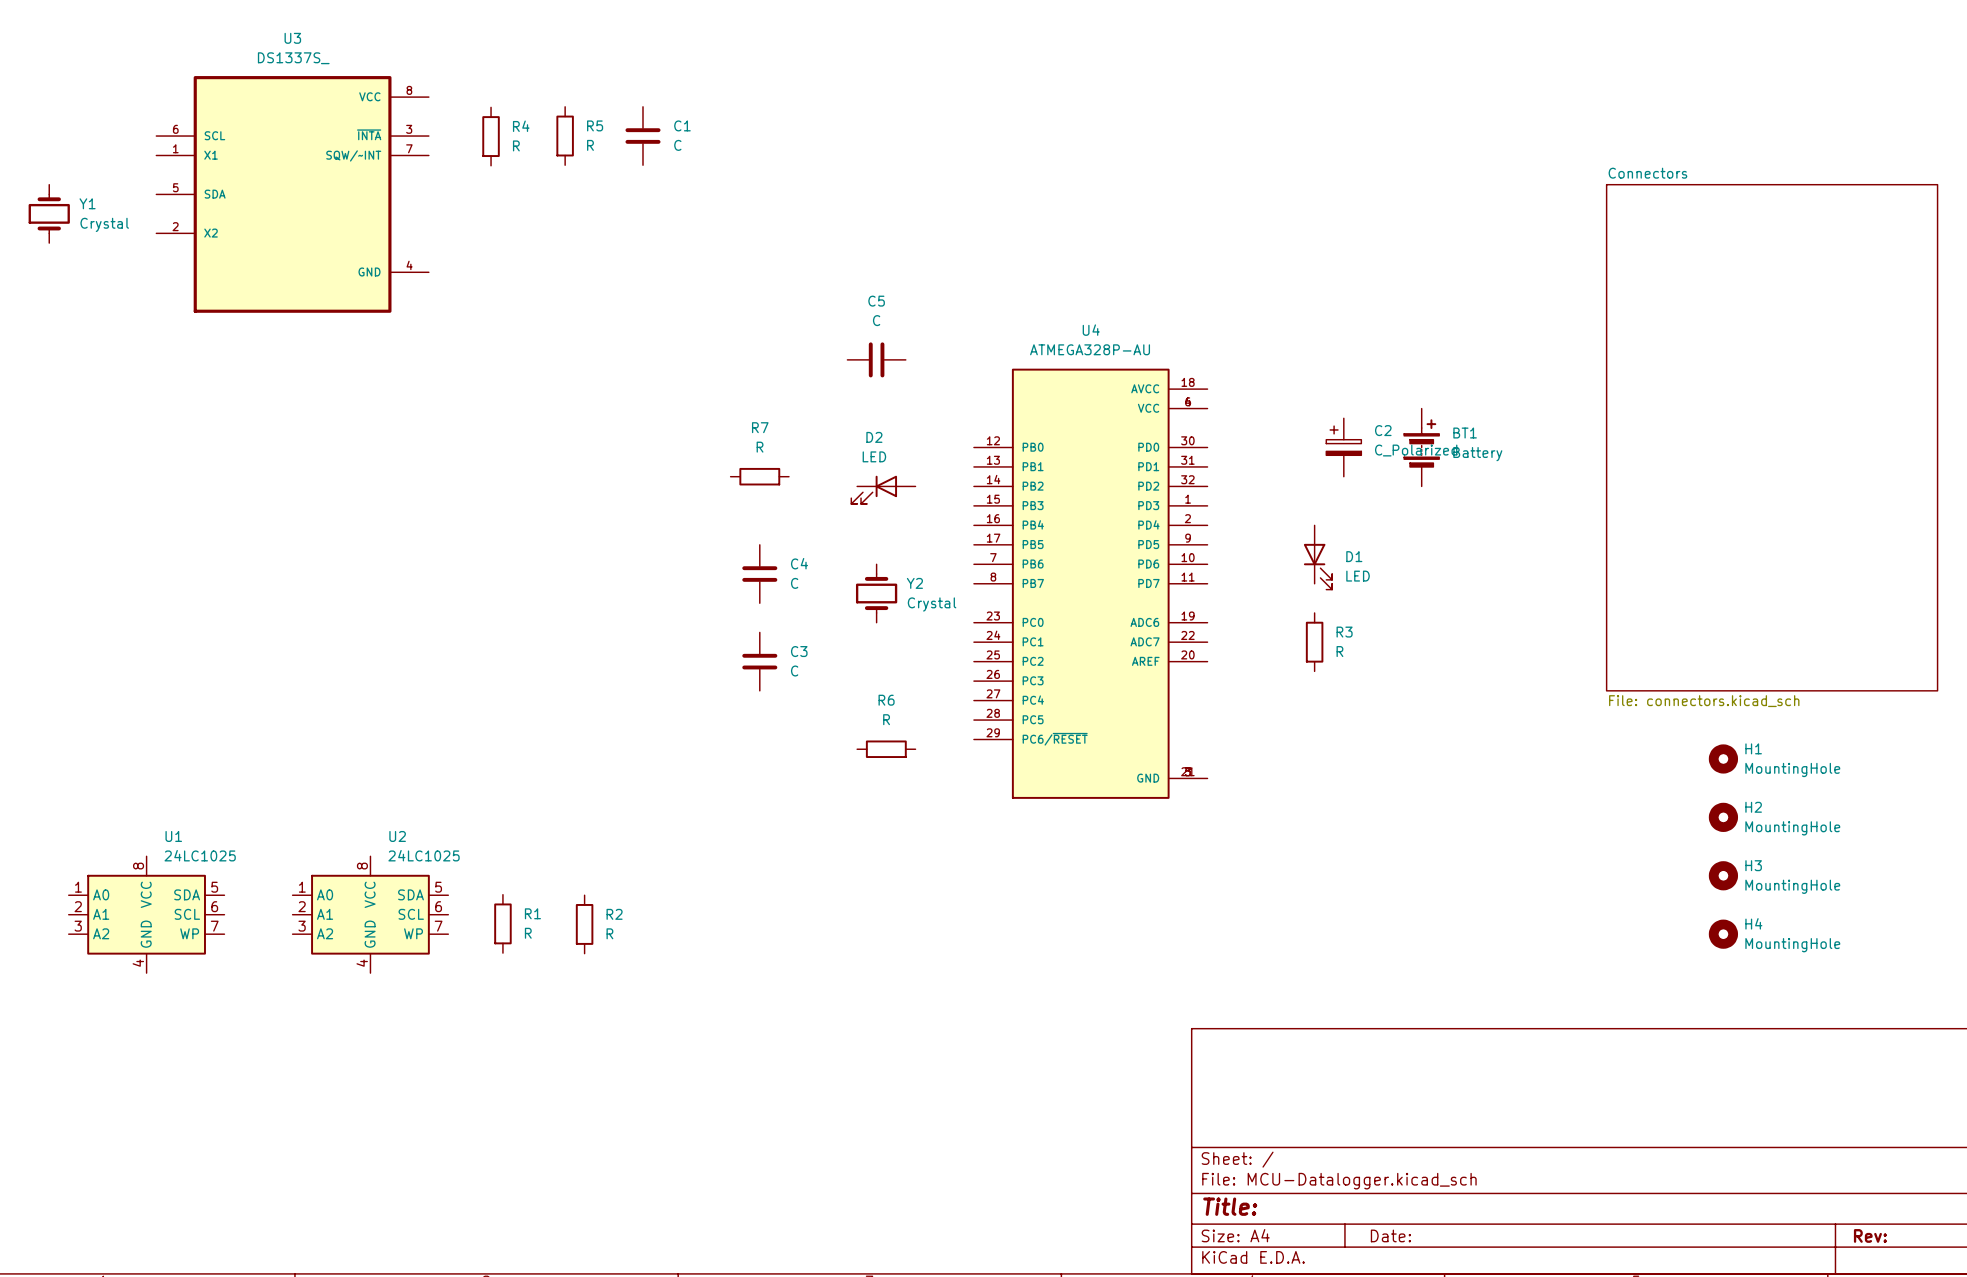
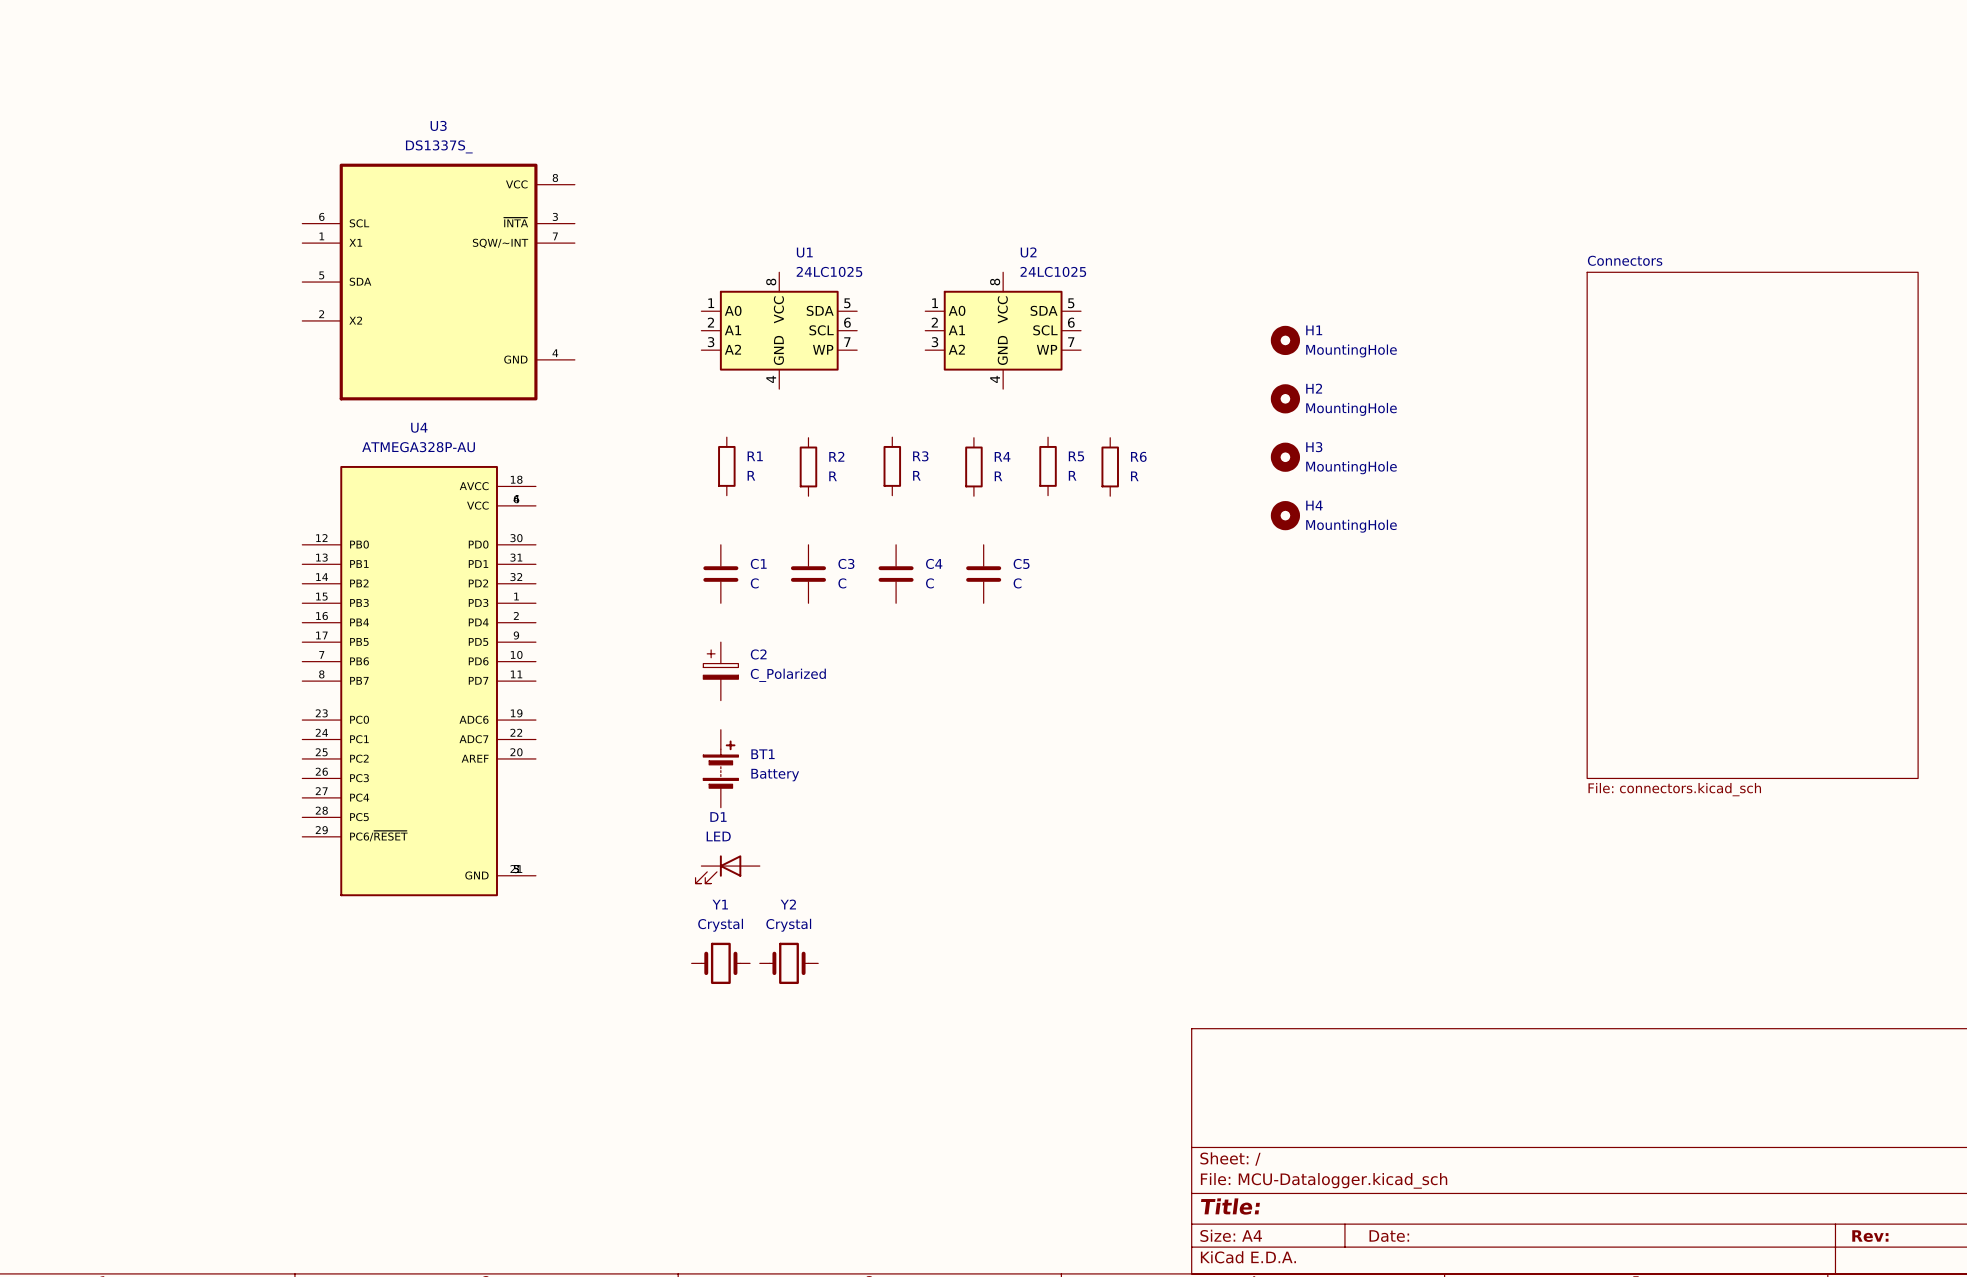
R4 position: (491, 136) -> (973, 466)
R5 position: (565, 136) -> (1048, 466)
C1 position: (642, 136) -> (720, 574)
U3 position: (292, 194) -> (438, 282)
Y1 name position: Y1 (87, 203) -> Y1 (720, 904)
Y1 rotation: 0° (49, 213) -> 90° clockwise (720, 963)
Y1 position: (49, 213) -> (720, 963)
Y1 value position: Crystal (104, 224) -> Crystal (720, 925)
C5 name position: C5 (876, 301) -> C5 (1021, 563)
C5 rotation: 0° (876, 359) -> 90° clockwise (983, 574)
C5 position: (876, 359) -> (983, 574)
sheet Connectors position: (1772, 437) -> (1752, 525)
C2 position: (1343, 447) -> (720, 671)
BT1 position: (1421, 447) -> (720, 768)
R7: R (759, 476) -> none
D2: LED (883, 489) -> none
D1 name position: D1 (1354, 556) -> D1 (718, 817)
D1 position: (1318, 557) -> (727, 869)
D1 rotation: 0° (1318, 566) -> 90° clockwise (718, 869)
C4 position: (759, 574) -> (896, 574)
D1 value position: LED (1358, 576) -> LED (718, 836)
Y2 name position: Y2 (914, 583) -> Y2 (788, 904)
U4 position: (1090, 583) -> (419, 681)
Y2 rotation: 0° (876, 593) -> 90° clockwise (789, 963)
Y2 position: (876, 593) -> (789, 963)
Y2 value position: Crystal (932, 604) -> Crystal (788, 925)
R3 position: (1314, 642) -> (892, 466)
C3 position: (759, 661) -> (808, 574)
R6 name position: R6 (886, 700) -> R6 (1138, 456)
R6 rotation: 0° (886, 749) -> 90° clockwise (1110, 466)
R6 position: (886, 749) -> (1110, 466)
H1 position: (1723, 758) -> (1285, 340)
H2 position: (1723, 817) -> (1285, 398)
H3 position: (1723, 875) -> (1285, 457)
U1 position: (146, 914) -> (779, 330)
U2 position: (370, 914) -> (1003, 330)
R1 position: (502, 923) -> (726, 466)
R2 position: (584, 924) -> (808, 466)
H4 position: (1723, 934) -> (1285, 515)

